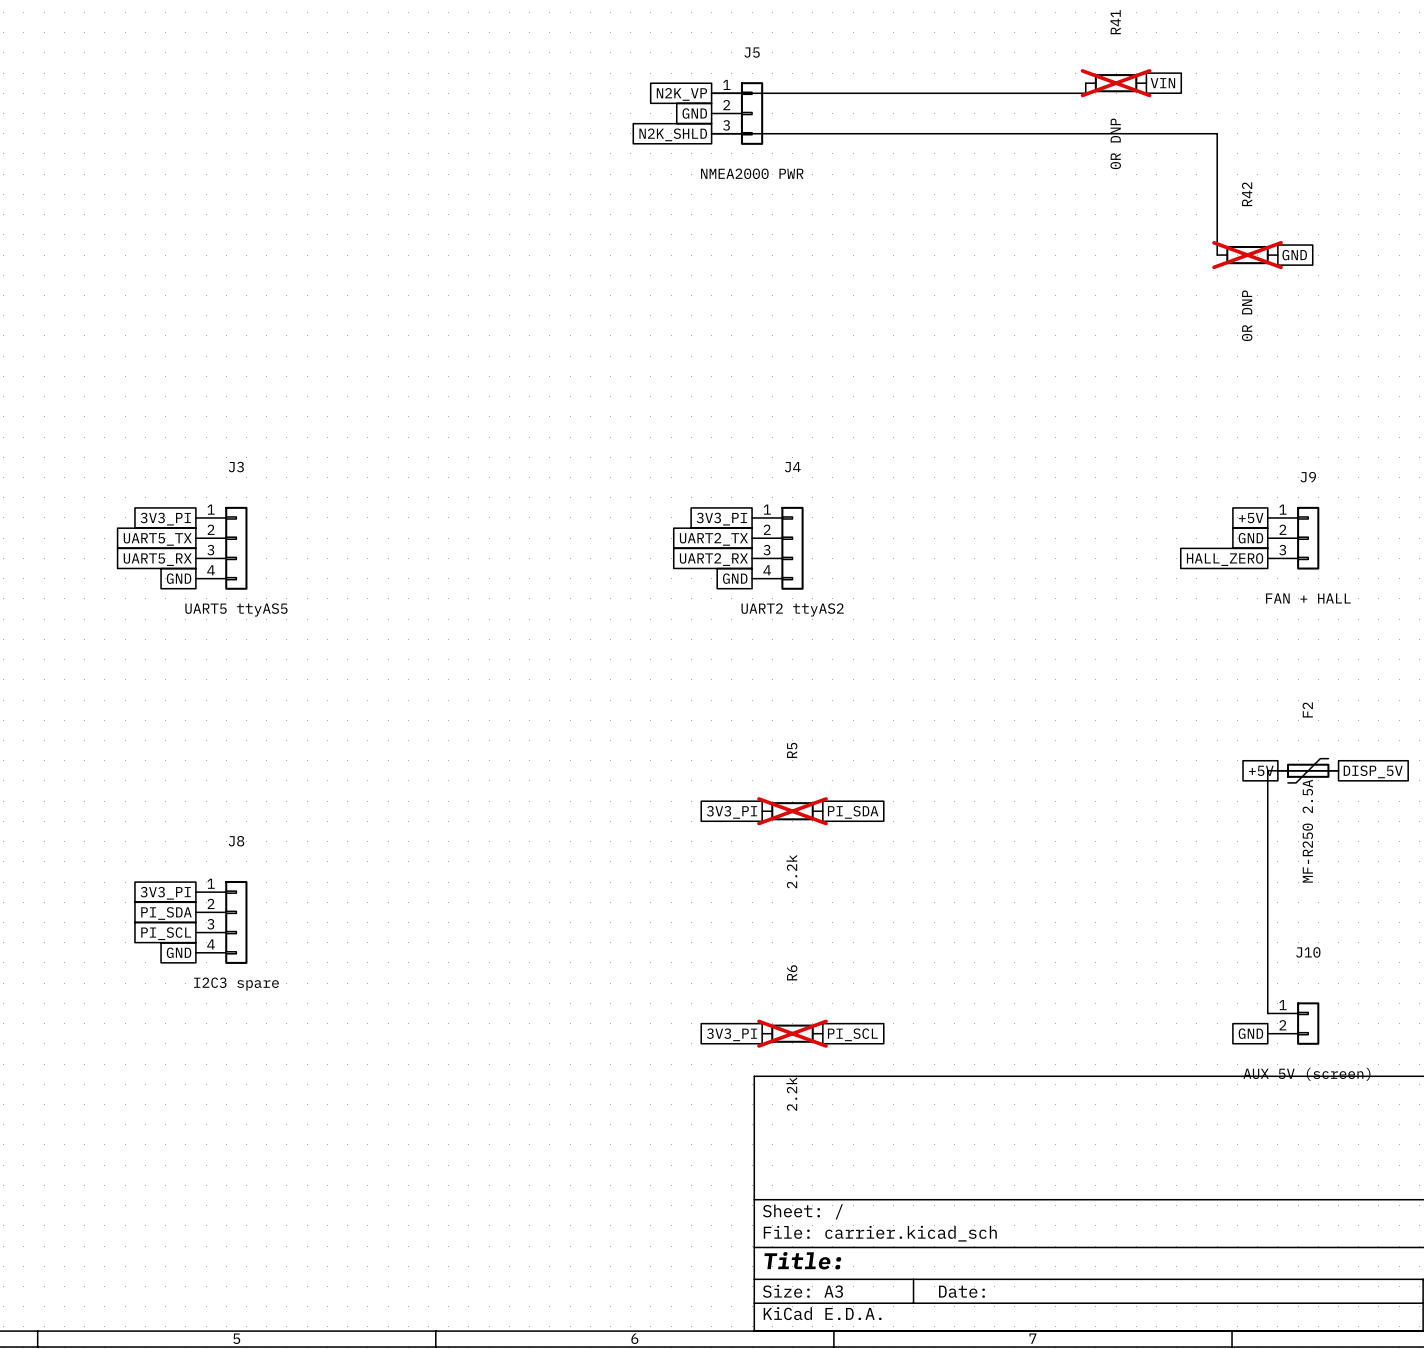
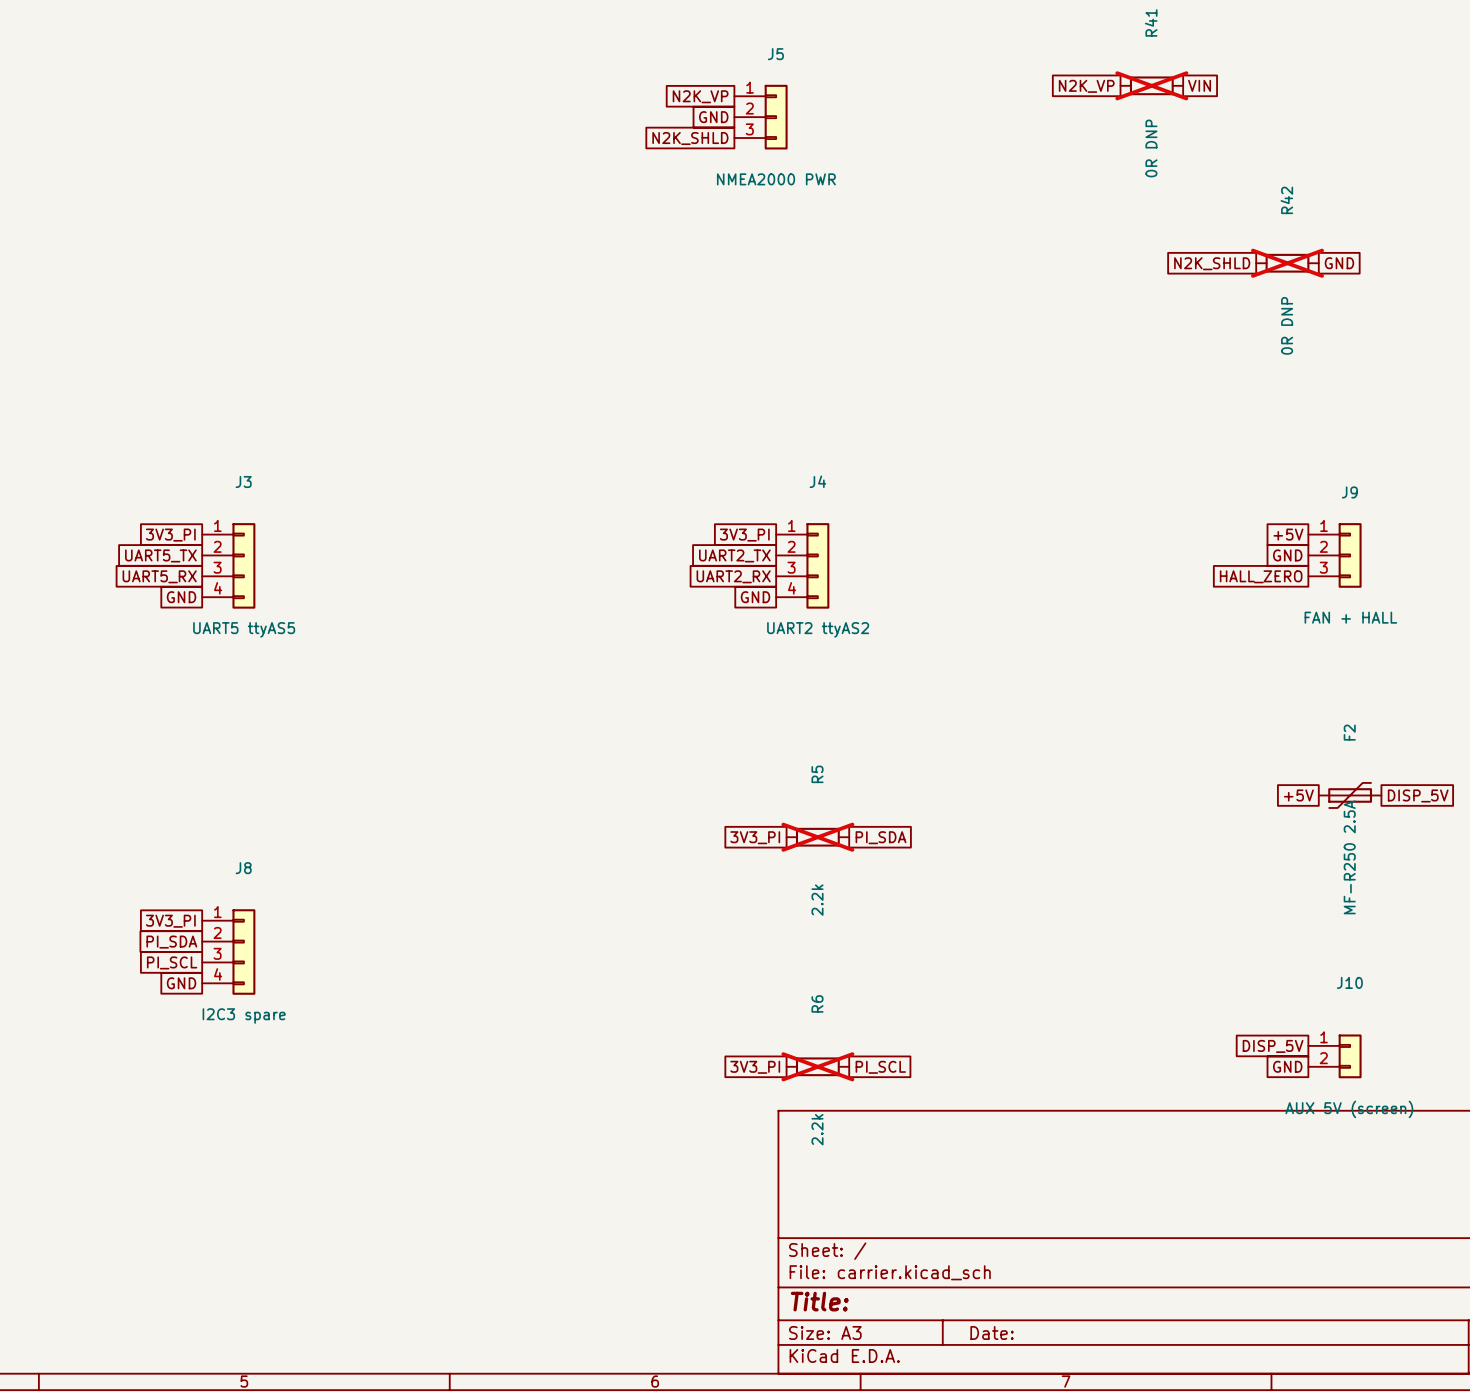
wire: (1085, 83) (1085, 93) (711, 93) -> none
global label: none -> N2K_VP (1086, 86)
wire: (711, 133) (1217, 133) (1217, 255) -> none
global label: none -> N2K_SHLD (1212, 263)
wire: (1338, 770) (1267, 770) (1267, 1013) -> none
global label: none -> DISP_5V (1273, 1046)

